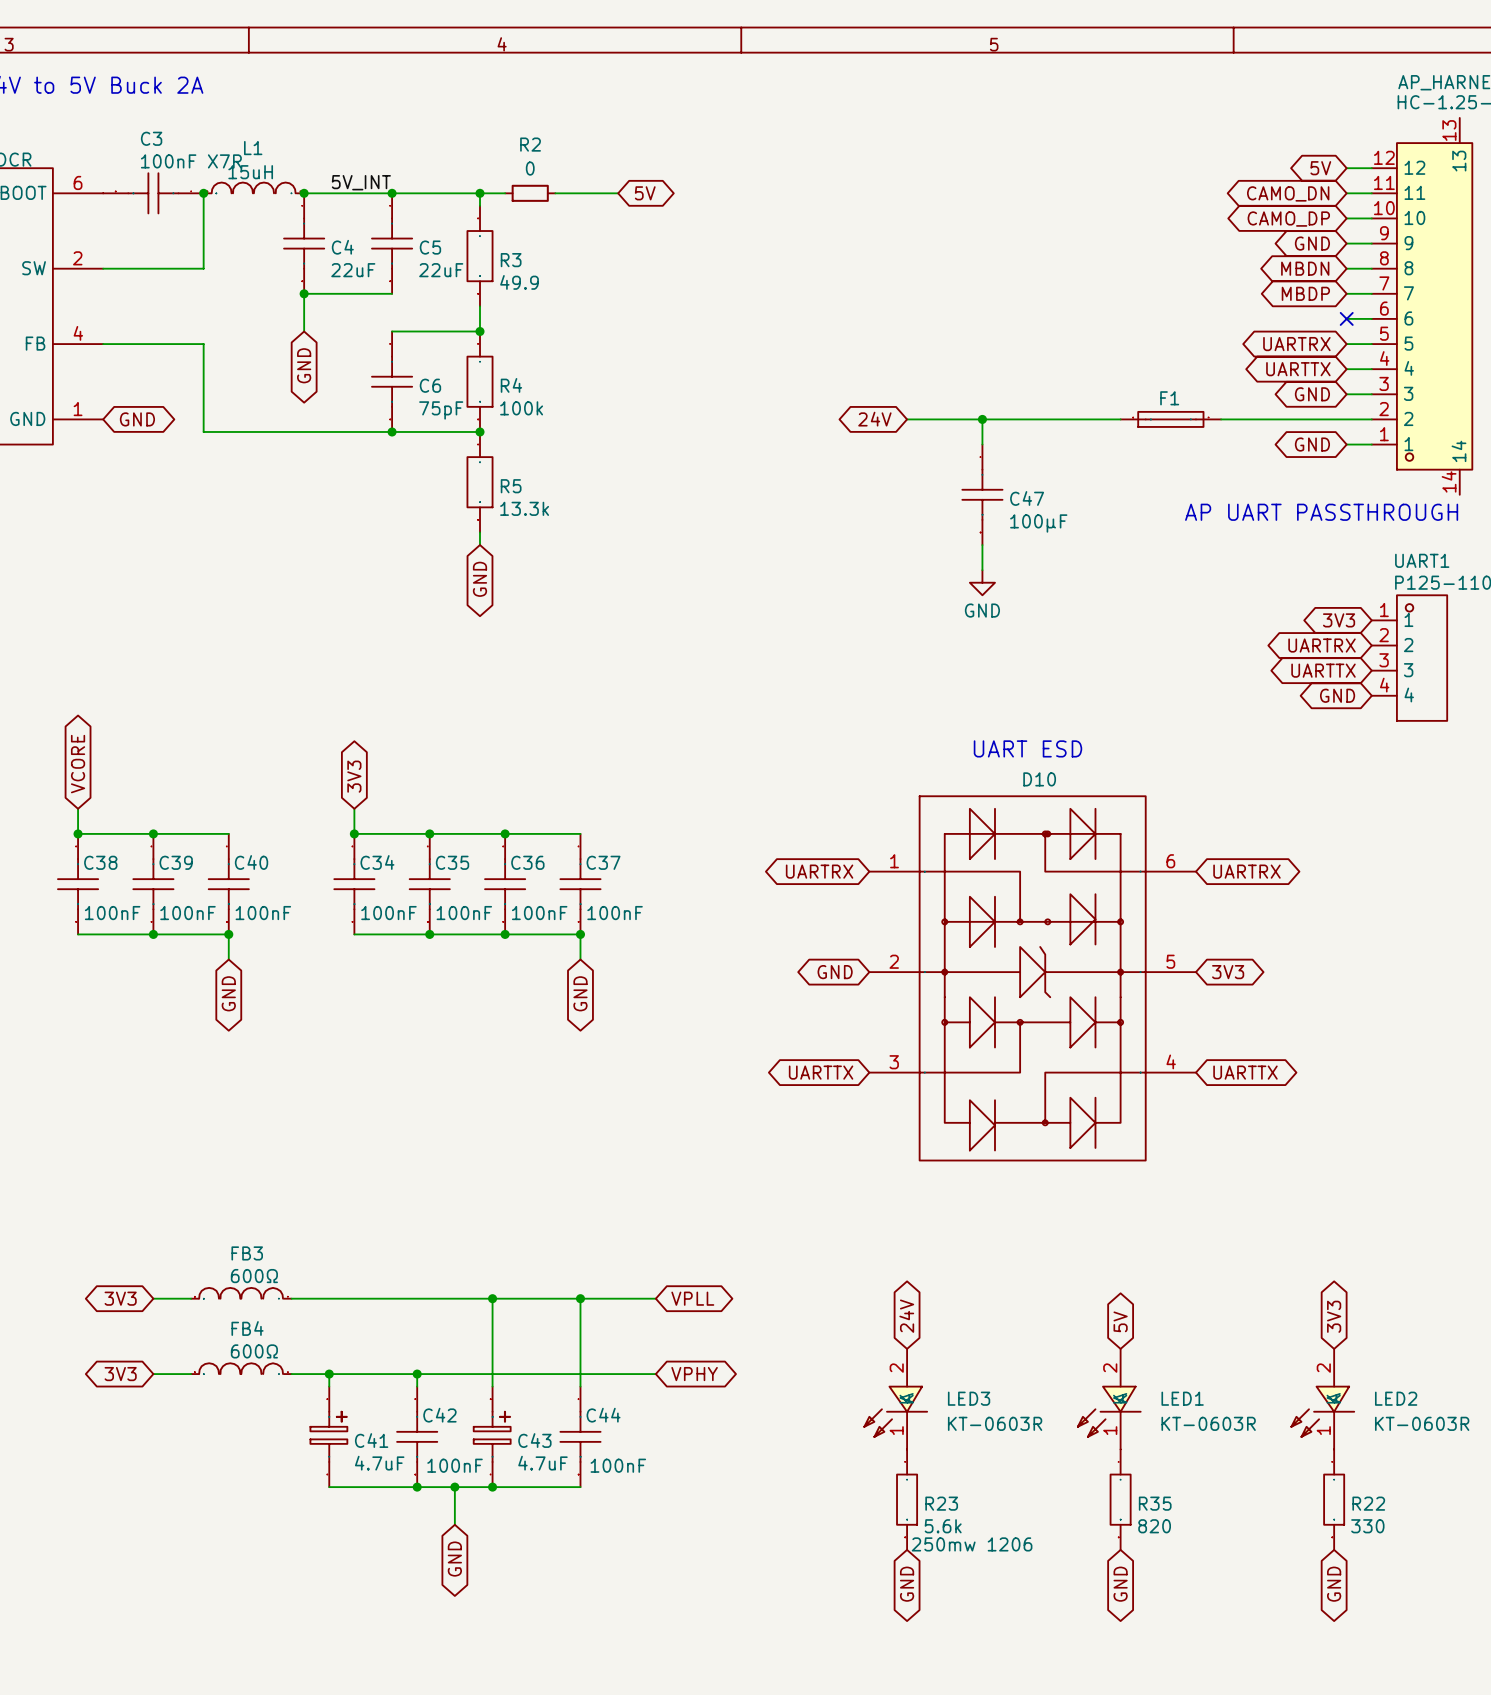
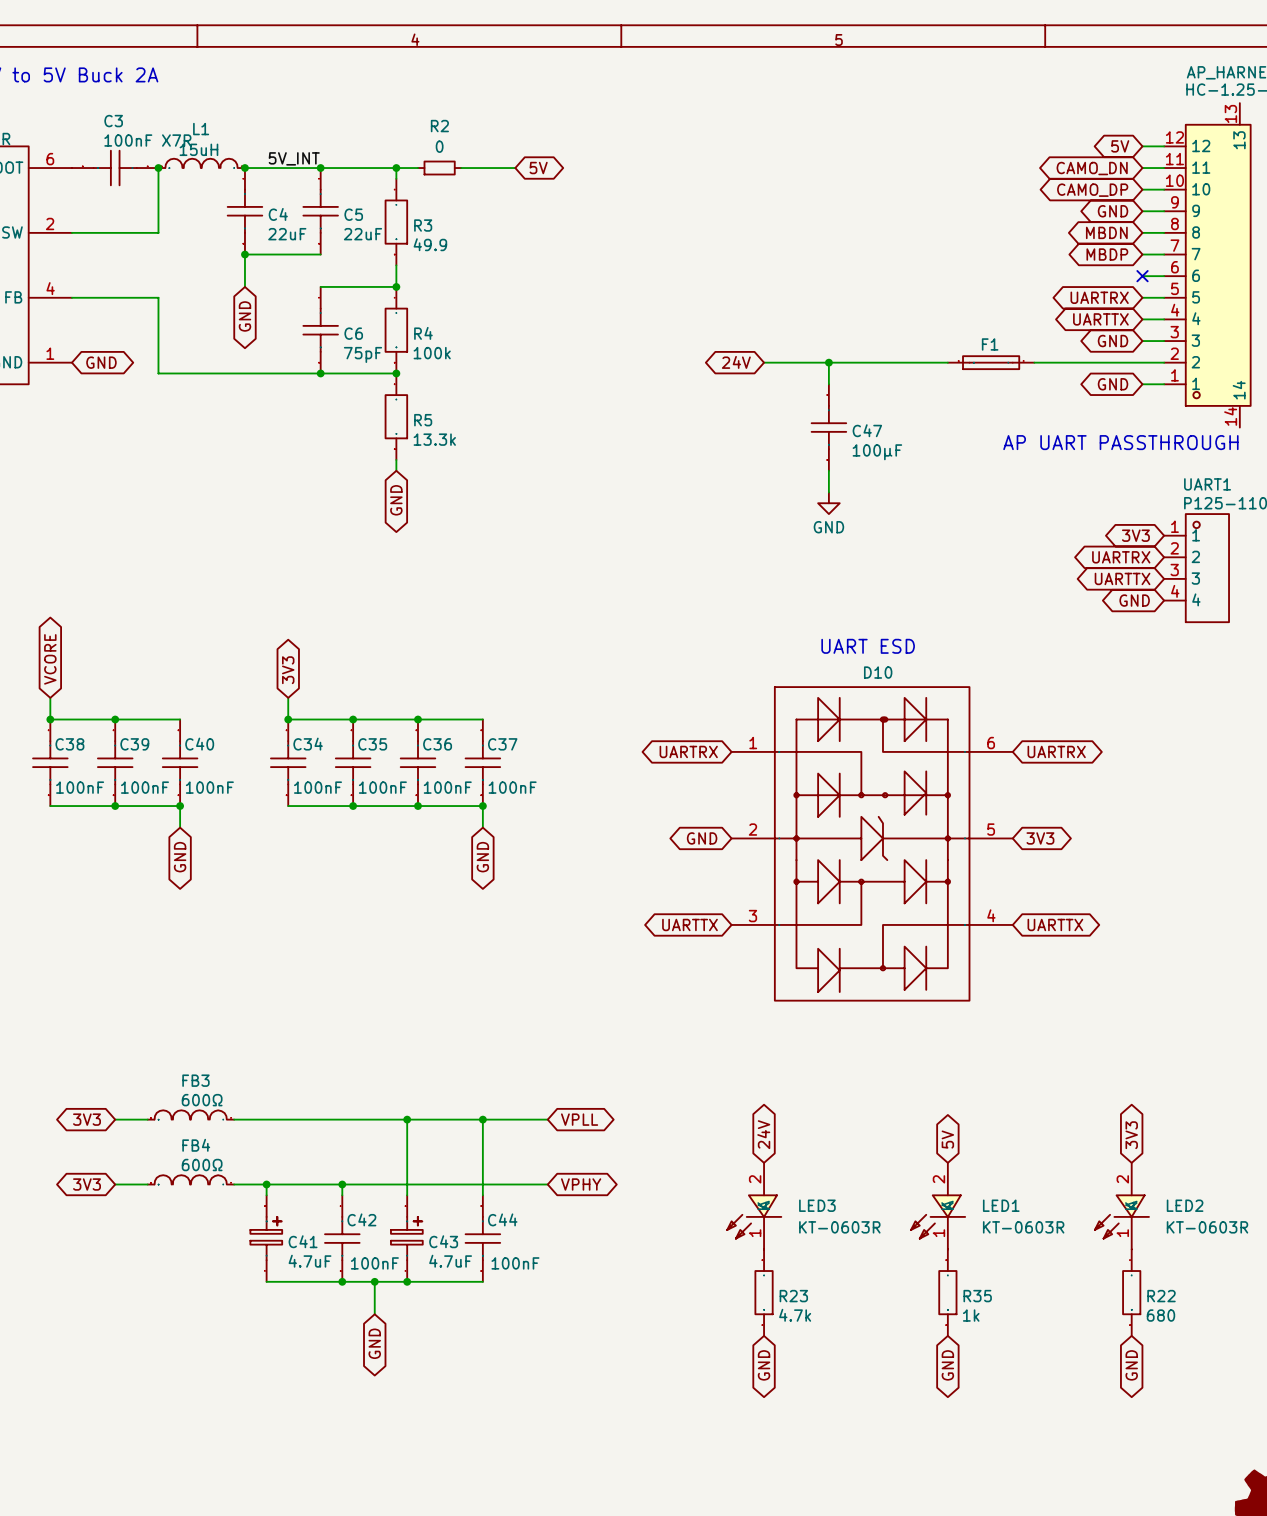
R23 value: 5.6k (943, 1526) -> 4.7k (795, 1315)
R35 value: 820 (1154, 1526) -> 1k (971, 1315)
R22 value: 330 (1367, 1526) -> 680 (1160, 1315)
R23 text: 250mw 1206 (972, 1544) -> none

